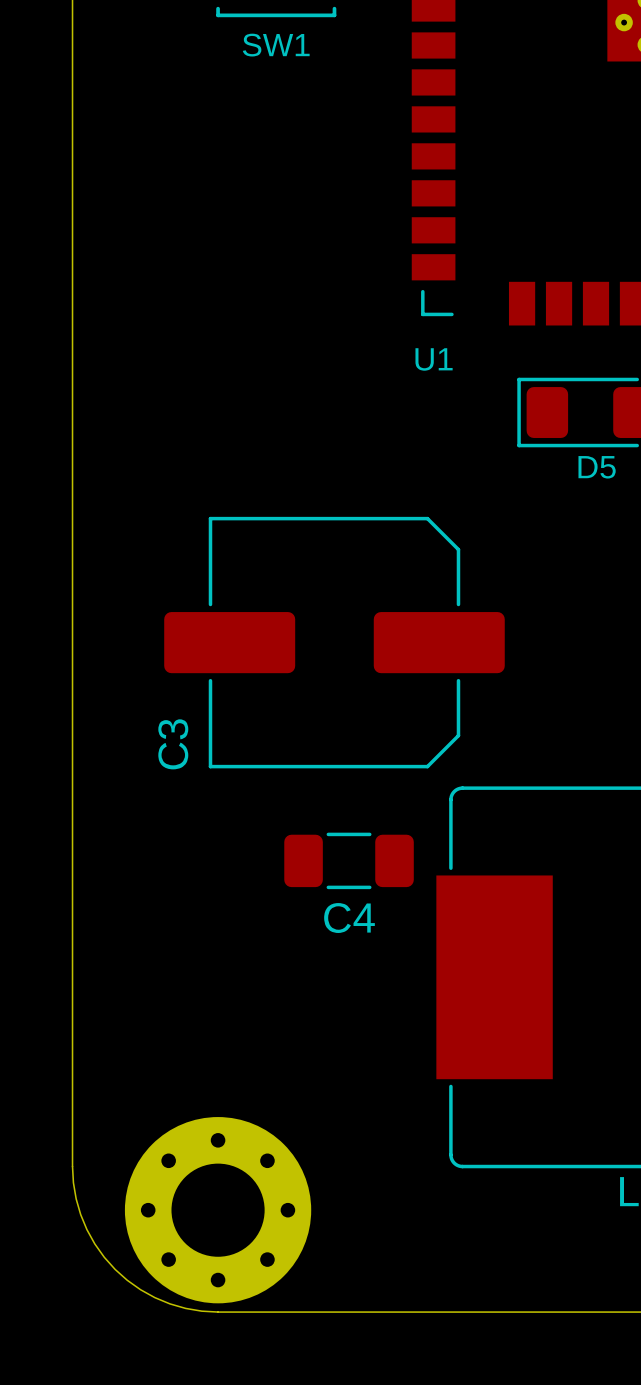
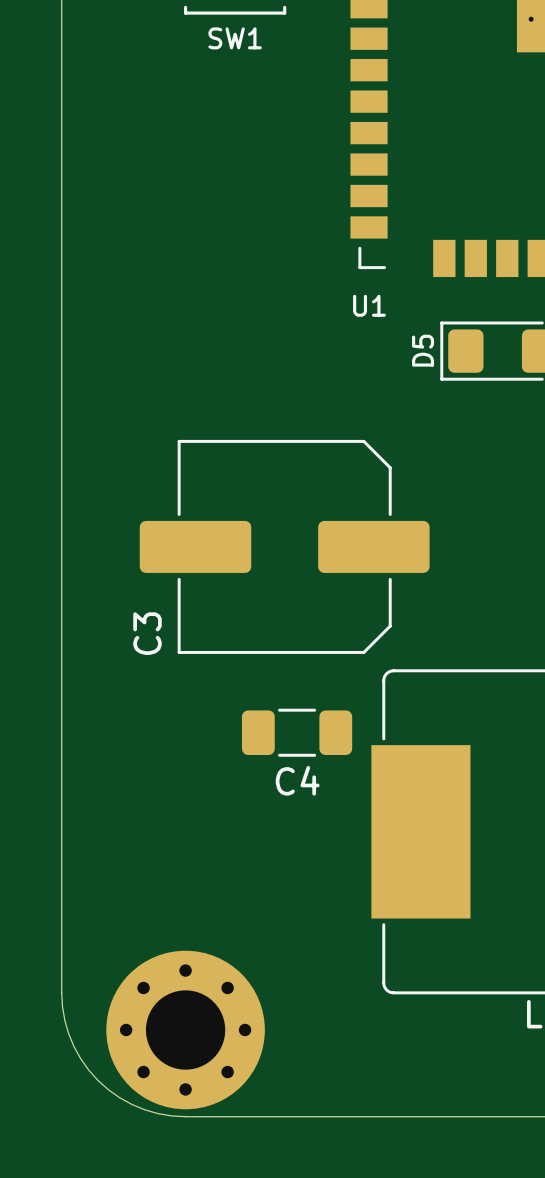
D5 name rotation: 0° (597, 467) -> 90° counterclockwise (423, 350)
D5 name position: D5 (597, 467) -> D5 (423, 350)

